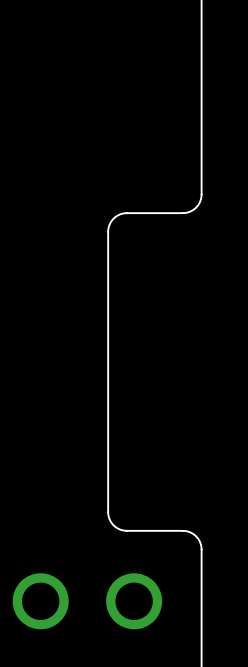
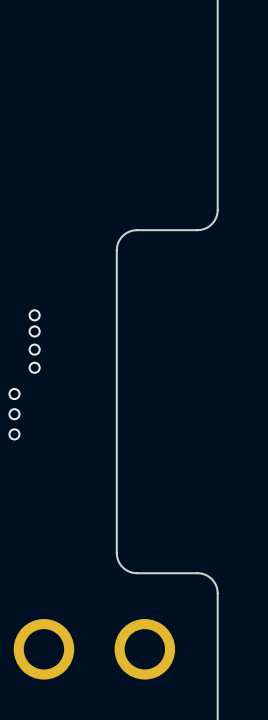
via: none -> (34, 315)
via: none -> (34, 331)
via: none -> (34, 349)
via: none -> (34, 367)
via: none -> (14, 394)
via: none -> (14, 414)
via: none -> (14, 434)

